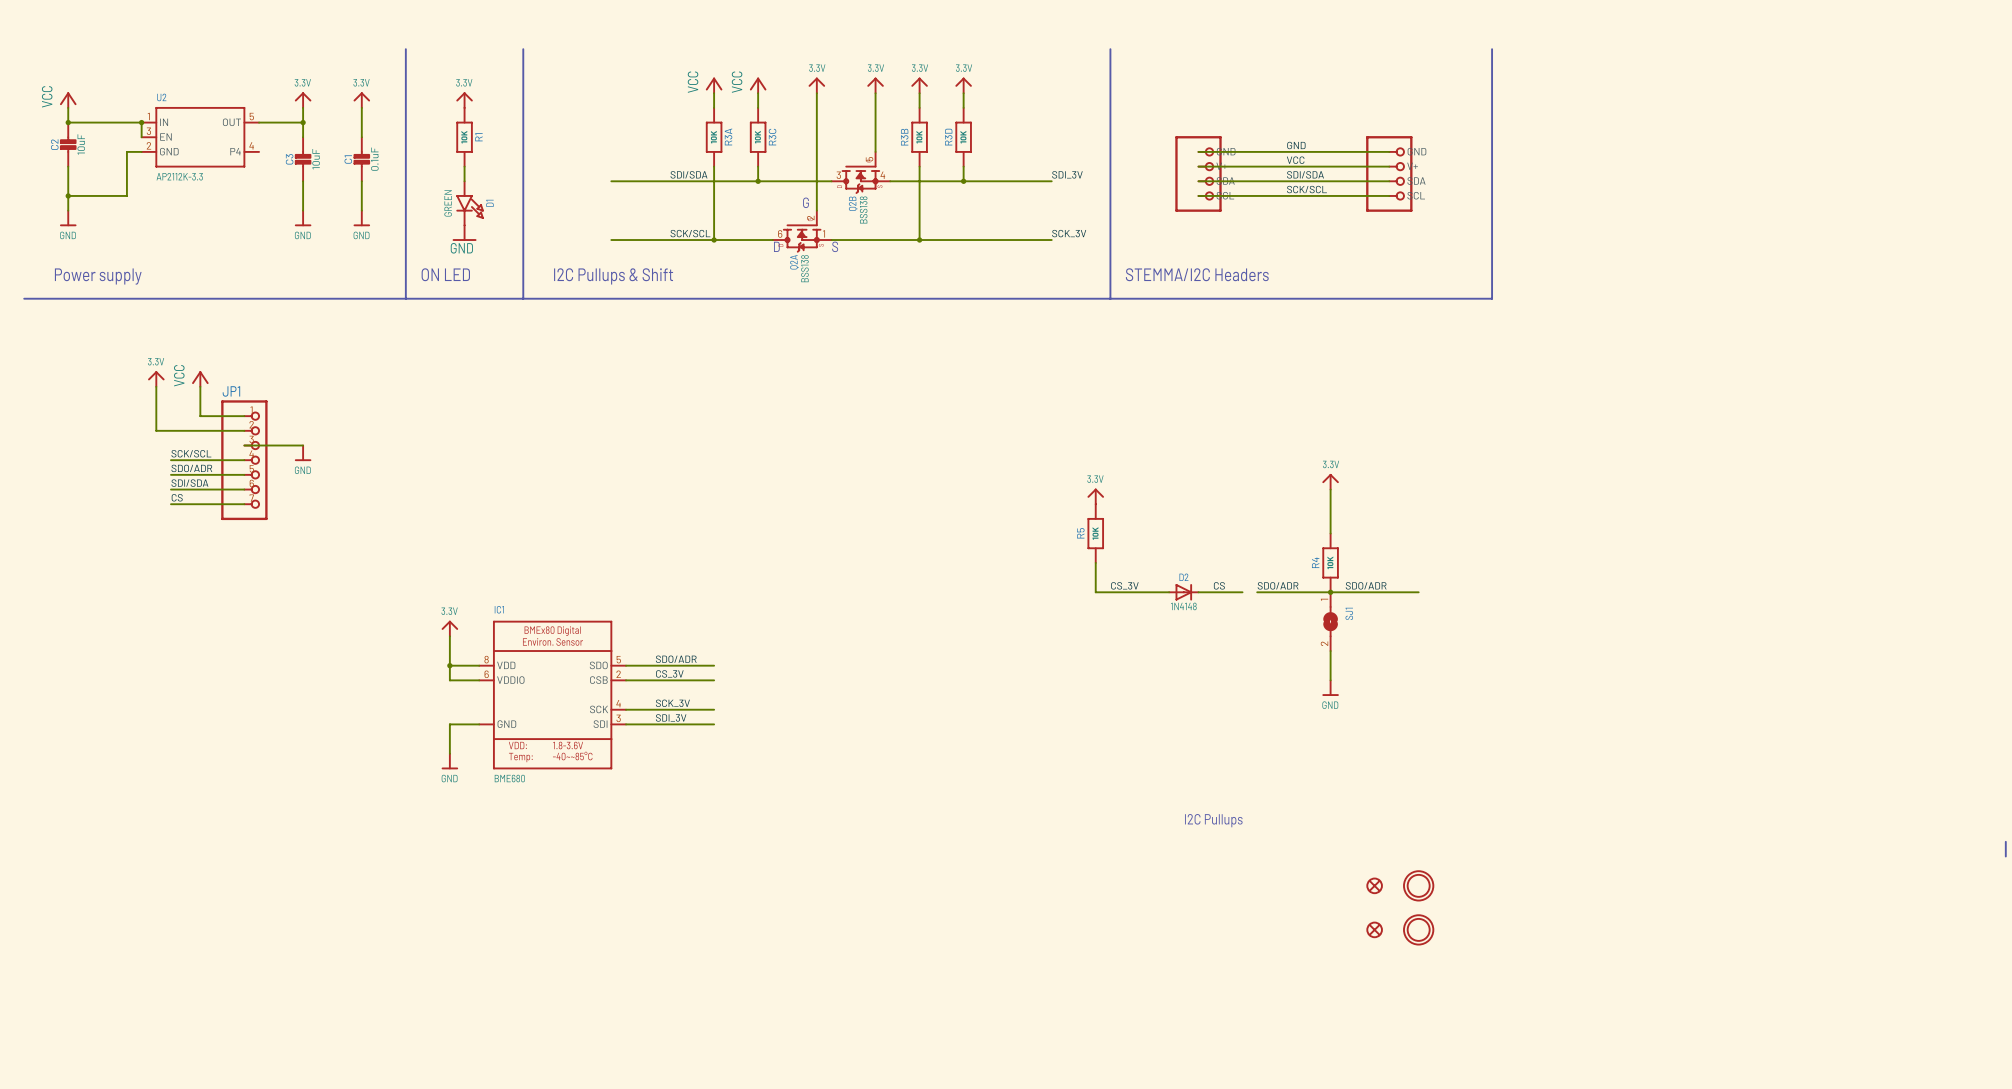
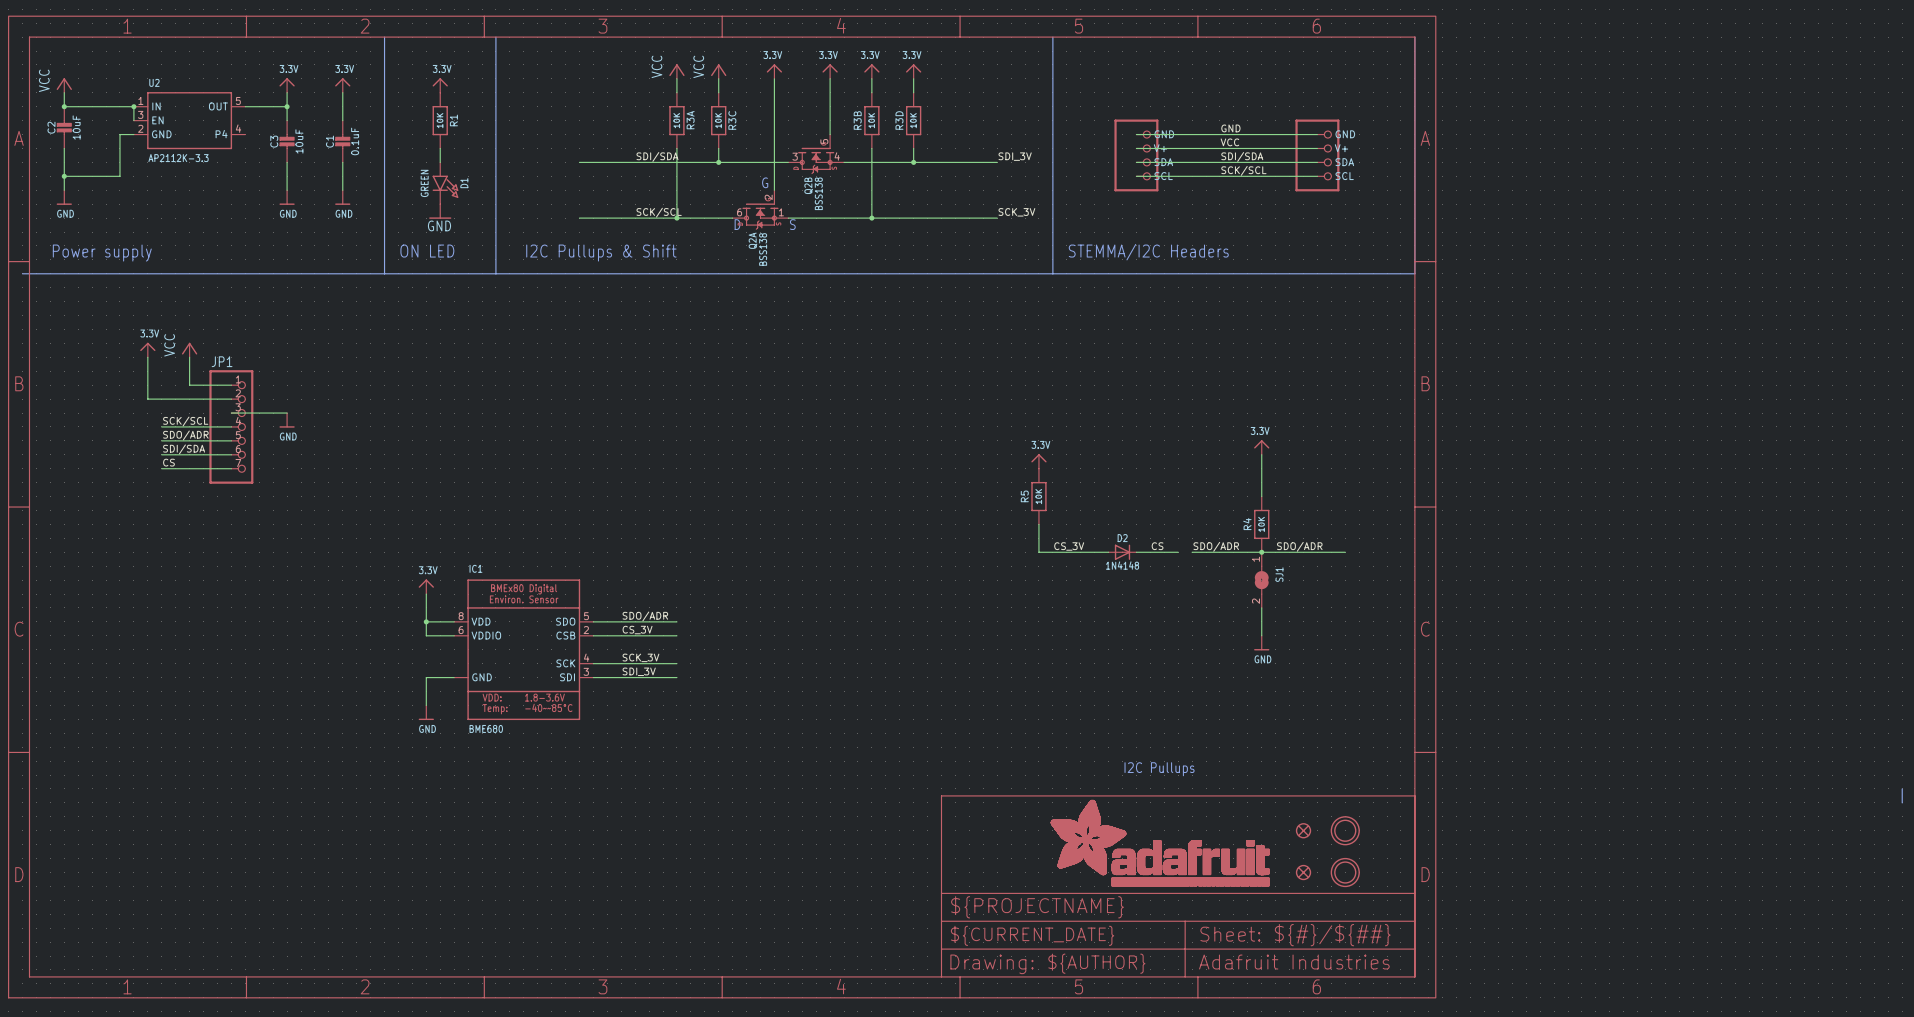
drawing: none -> [8, 16, 1436, 998]

